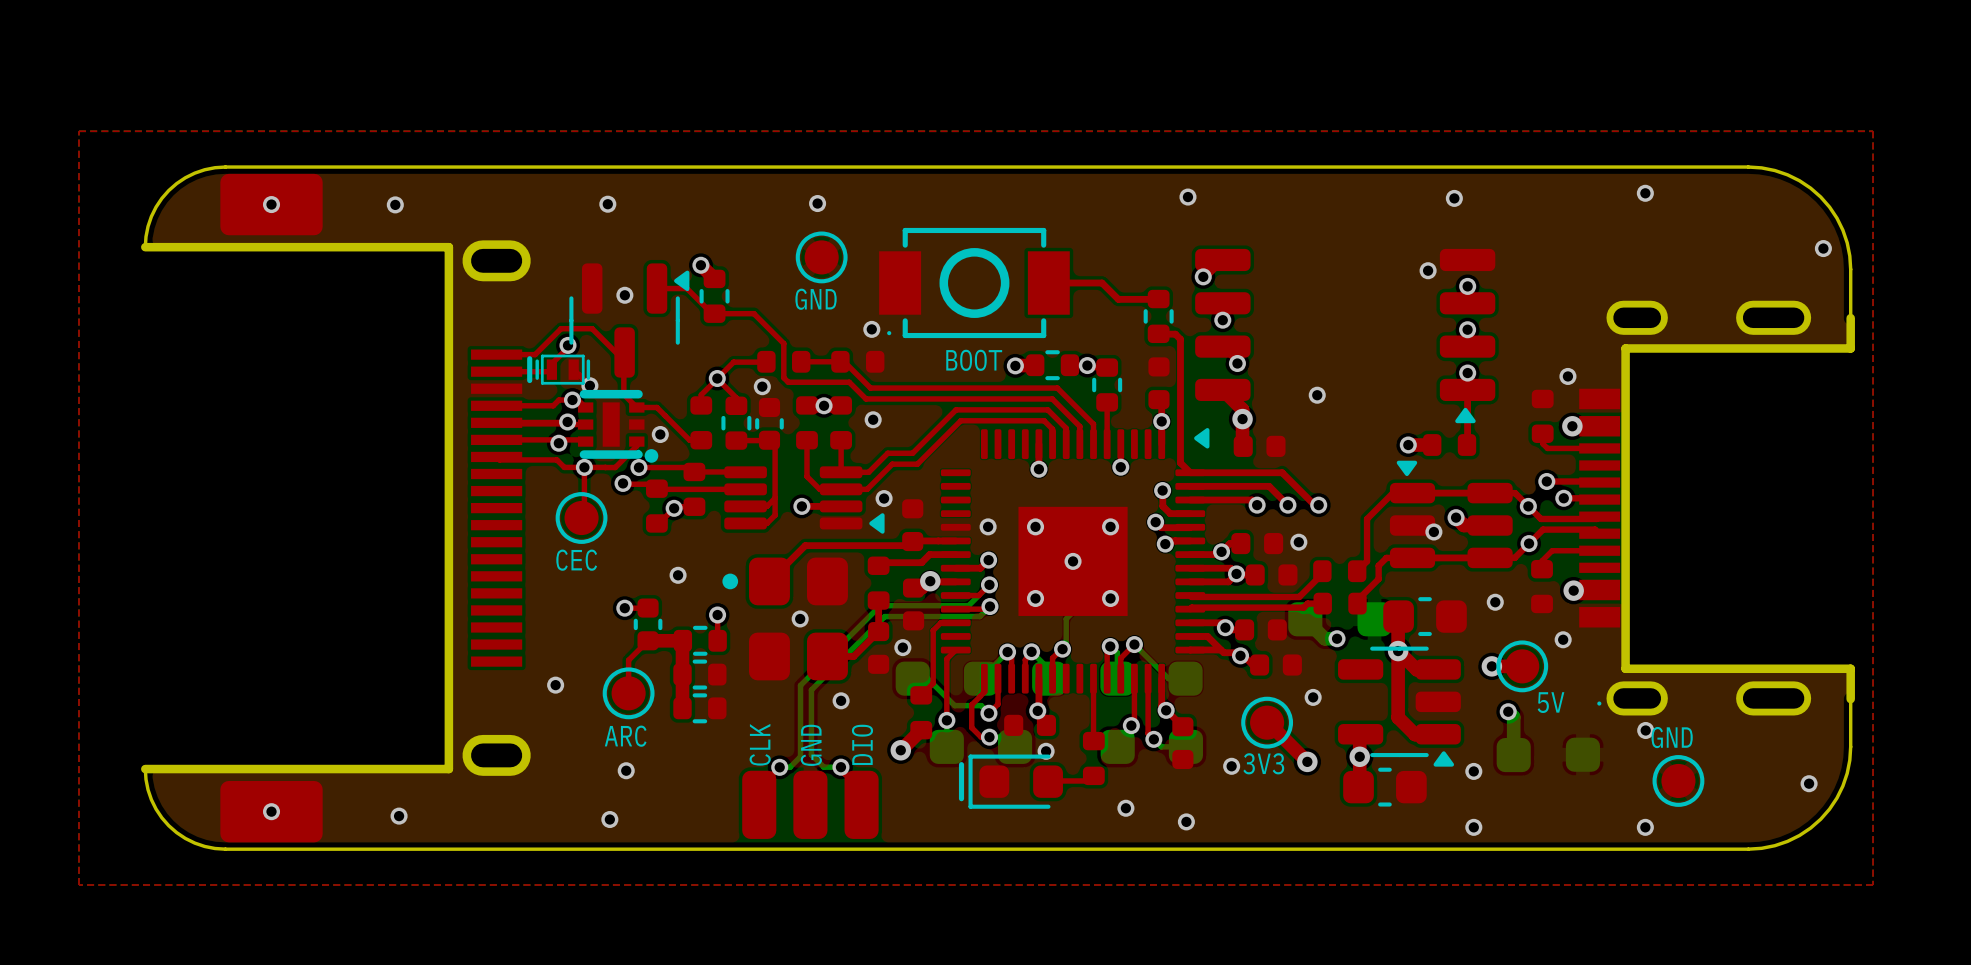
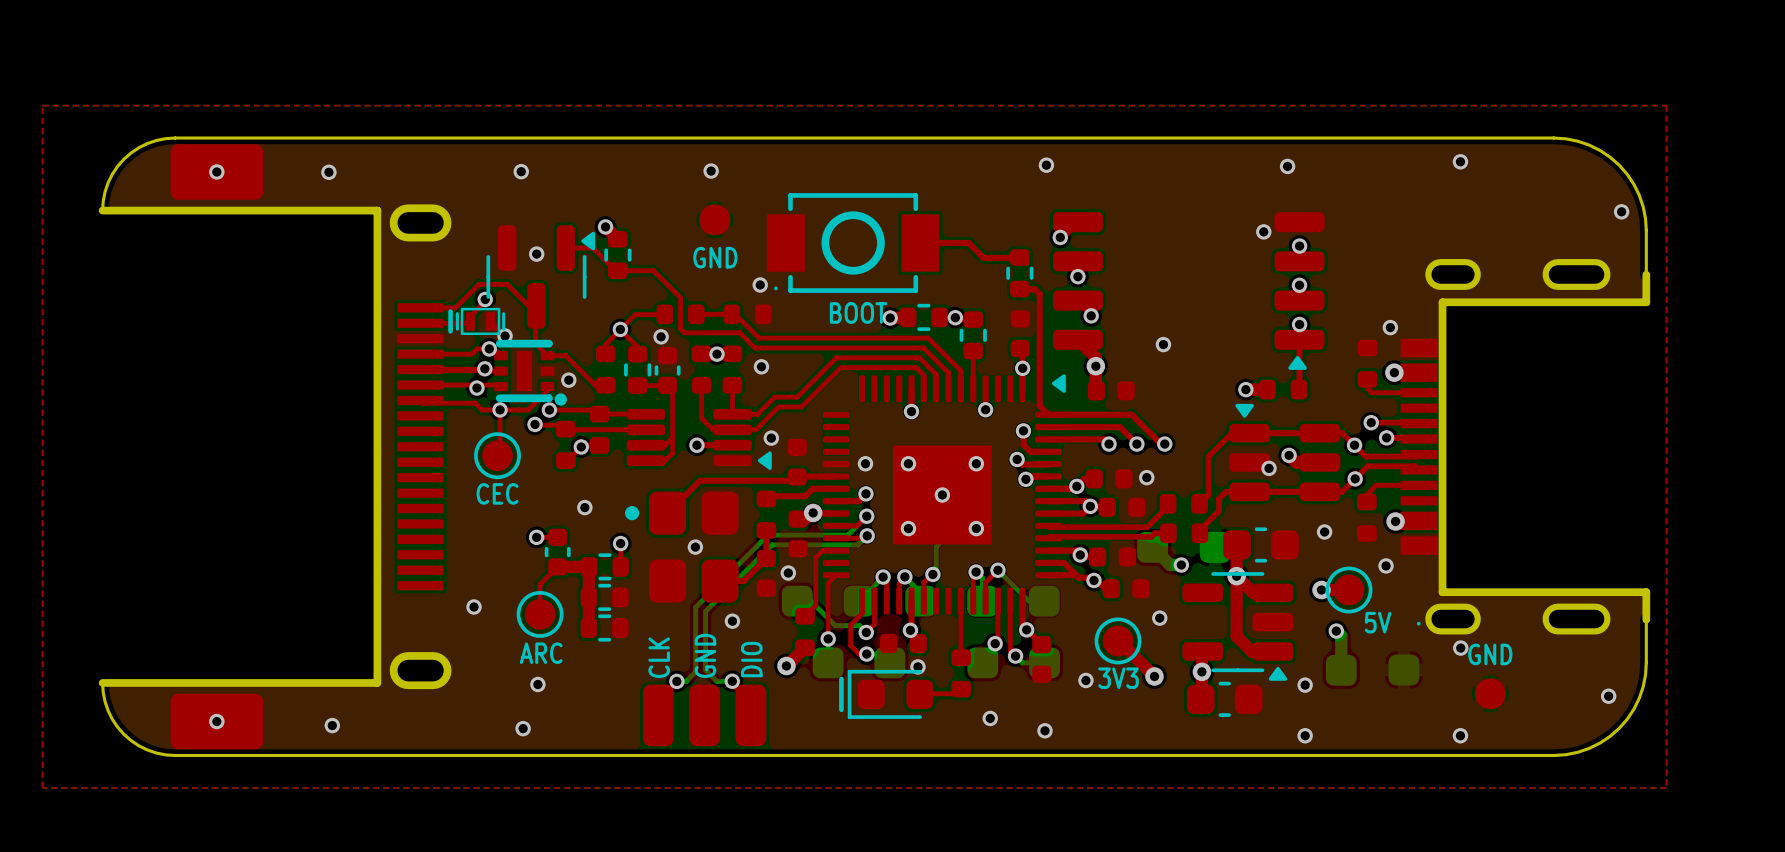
part footprint: [795, 231, 848, 284] -> [699, 204, 731, 236]
part footprint: [1652, 755, 1705, 807] -> [1474, 678, 1506, 710]

